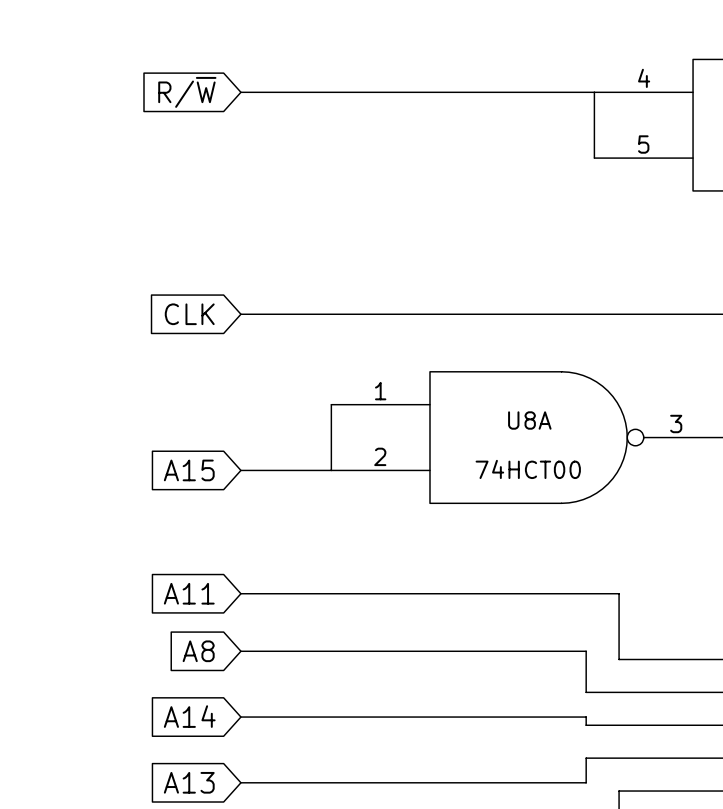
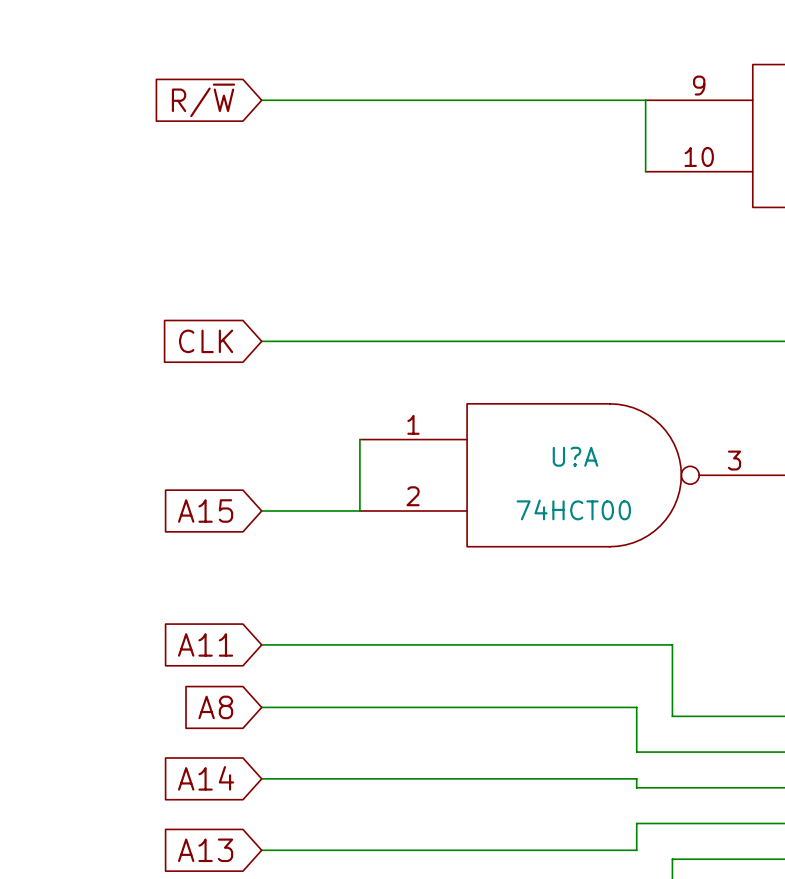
part pin number: 4 (644, 78) -> 9 (699, 85)
part pin number: 5 (643, 144) -> 10 (699, 156)
U8A name: U8A (529, 420) -> U?A (575, 456)

